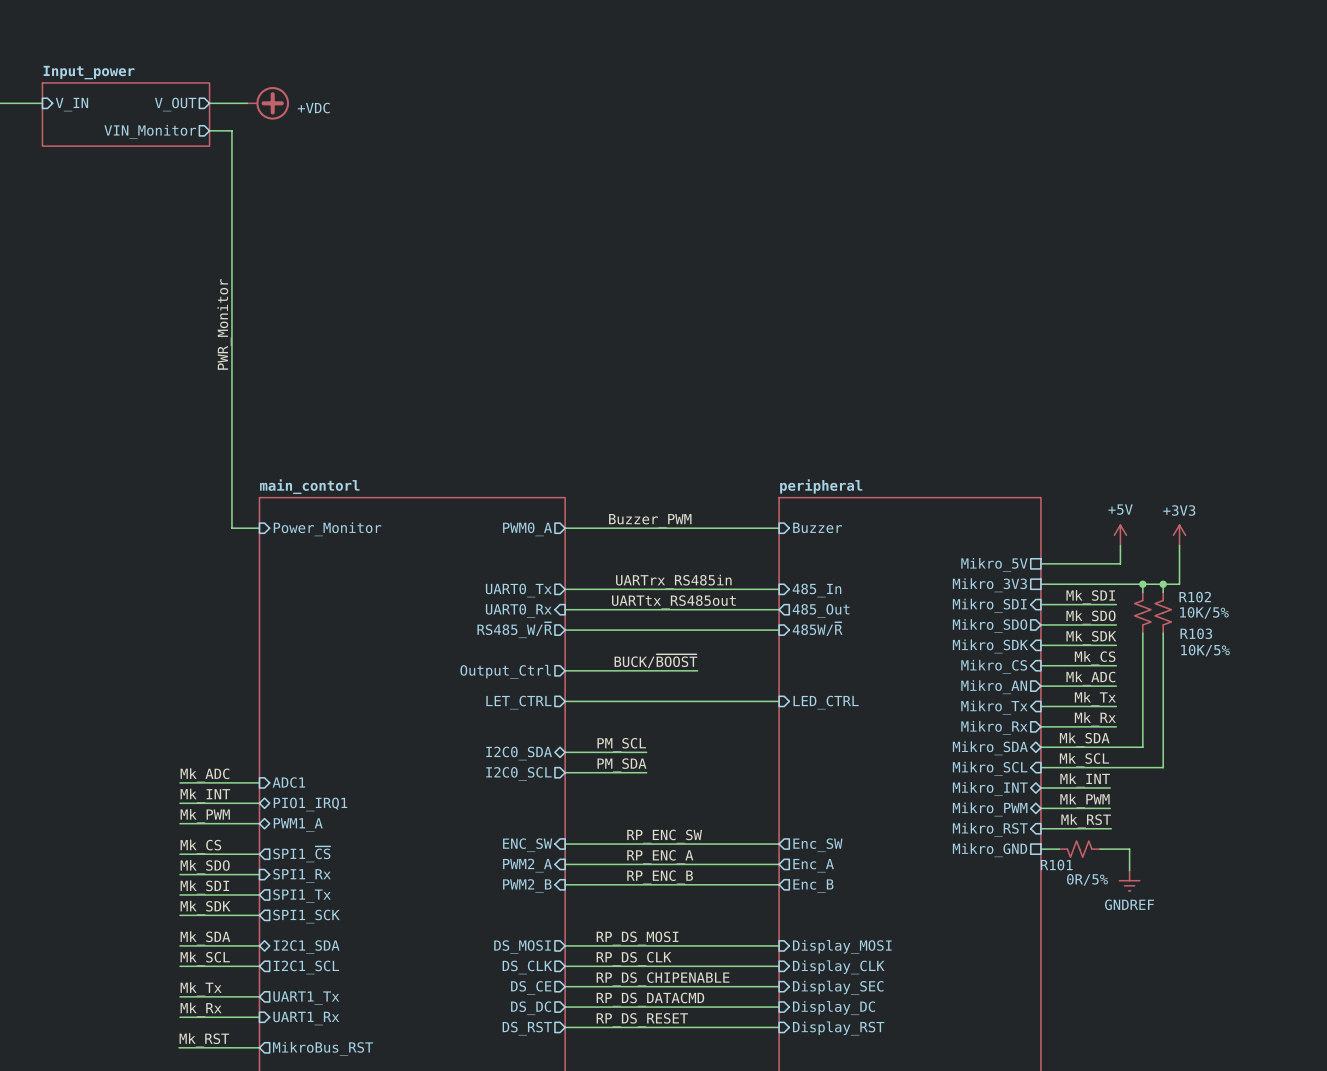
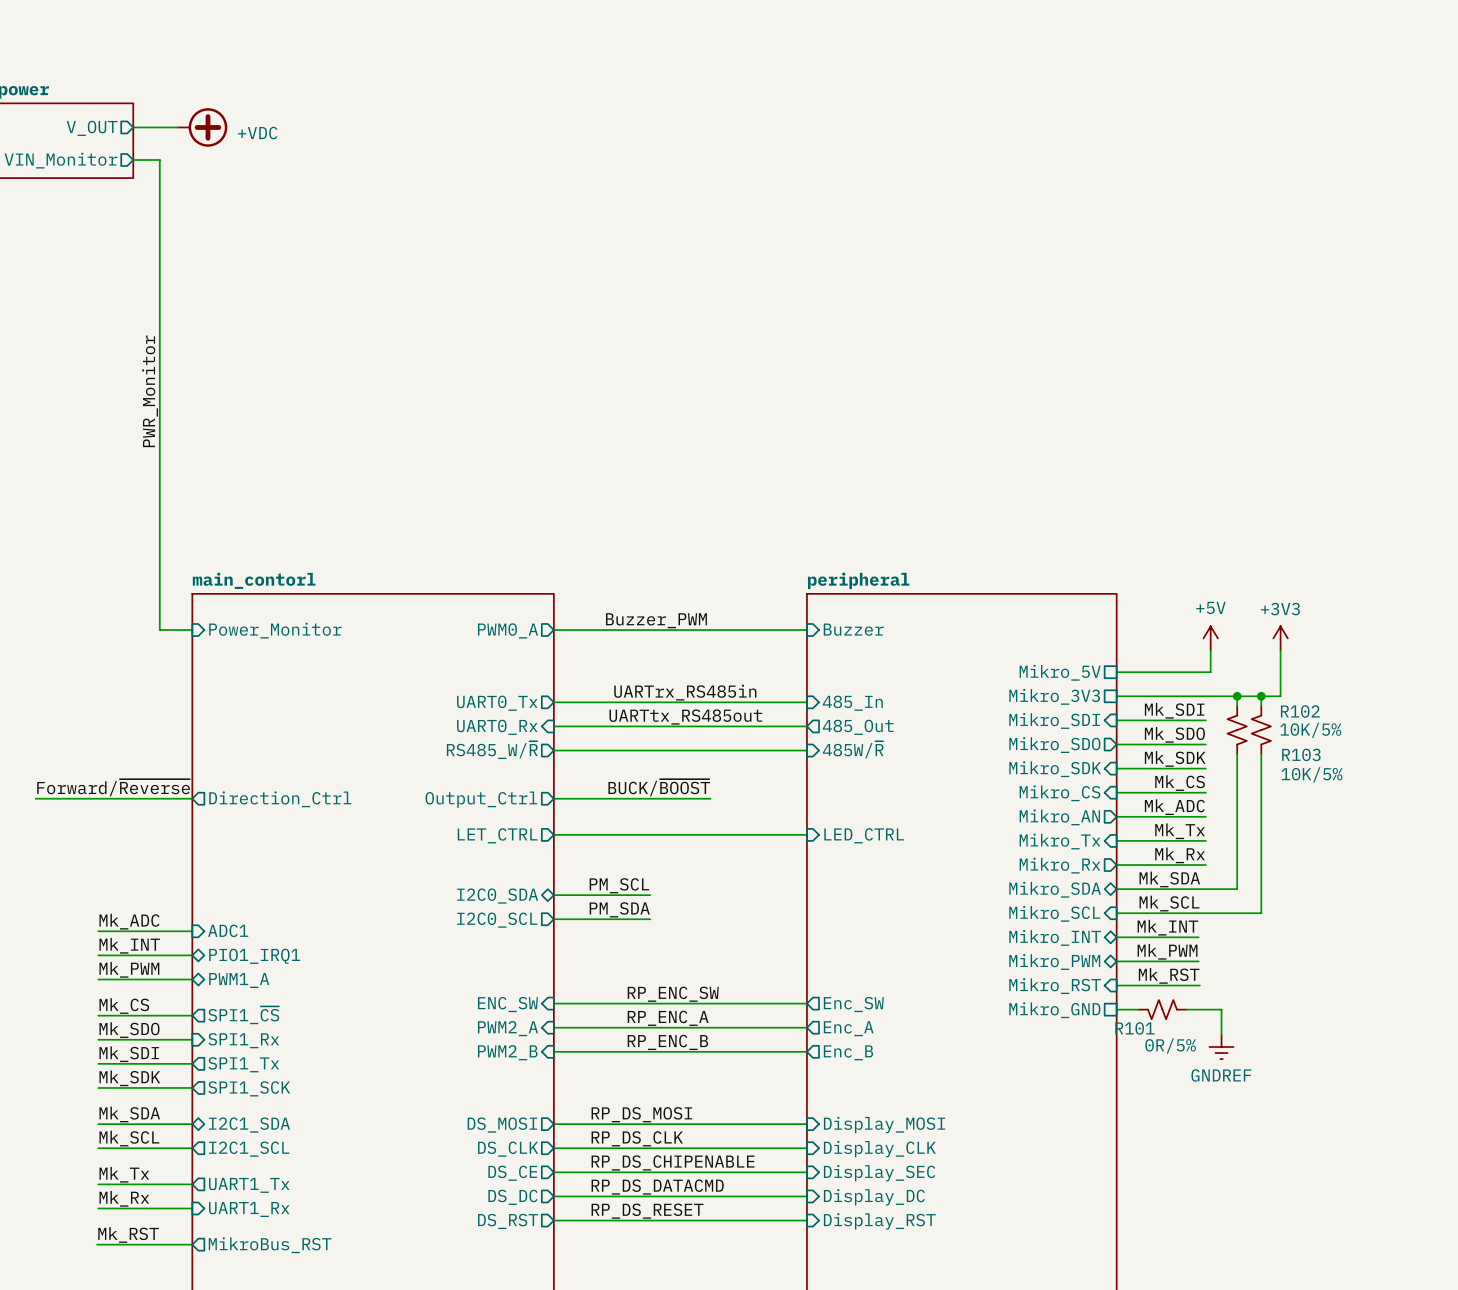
label: none -> Forward/~{Reverse} (113, 787)
wire: none -> (35, 798) (192, 798)
sheet pin: none -> Direction_Ctrl (280, 799)

